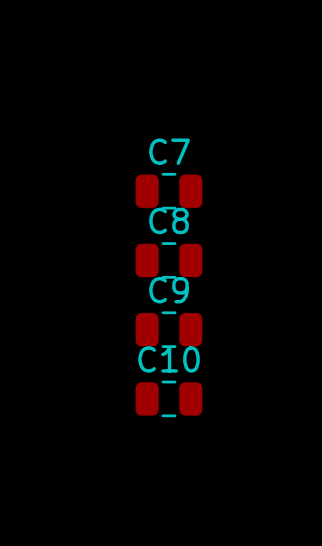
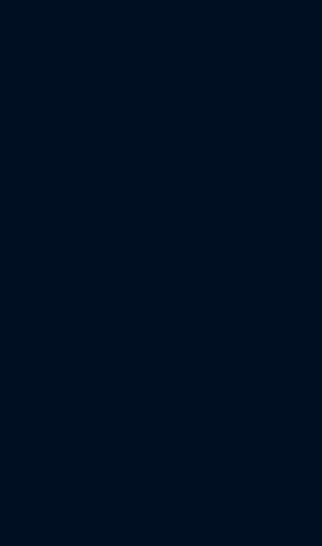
C7: (169, 191) -> none
C8: (169, 260) -> none
C9: (169, 329) -> none
C10: (169, 398) -> none

